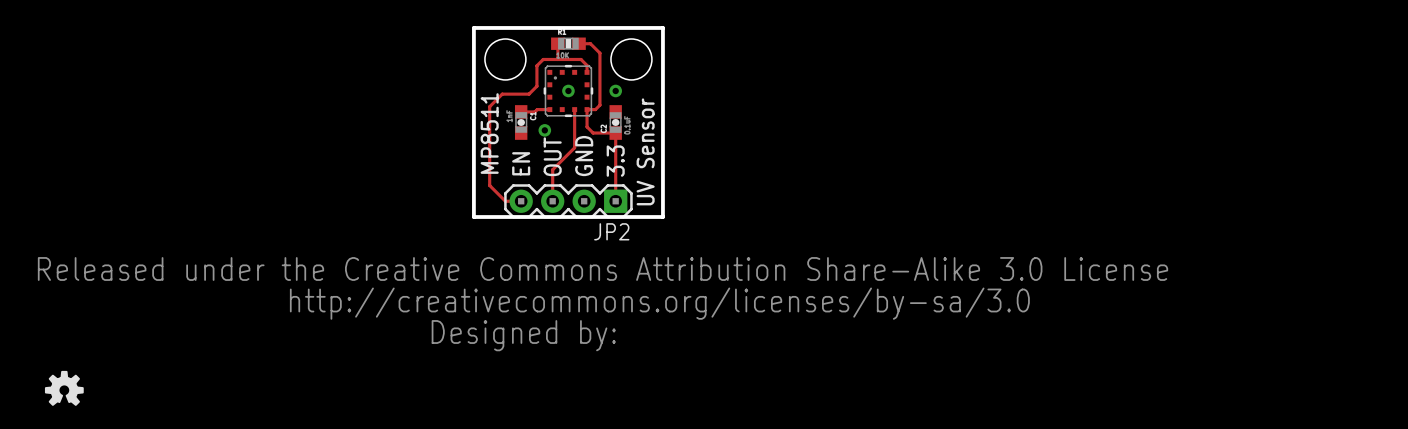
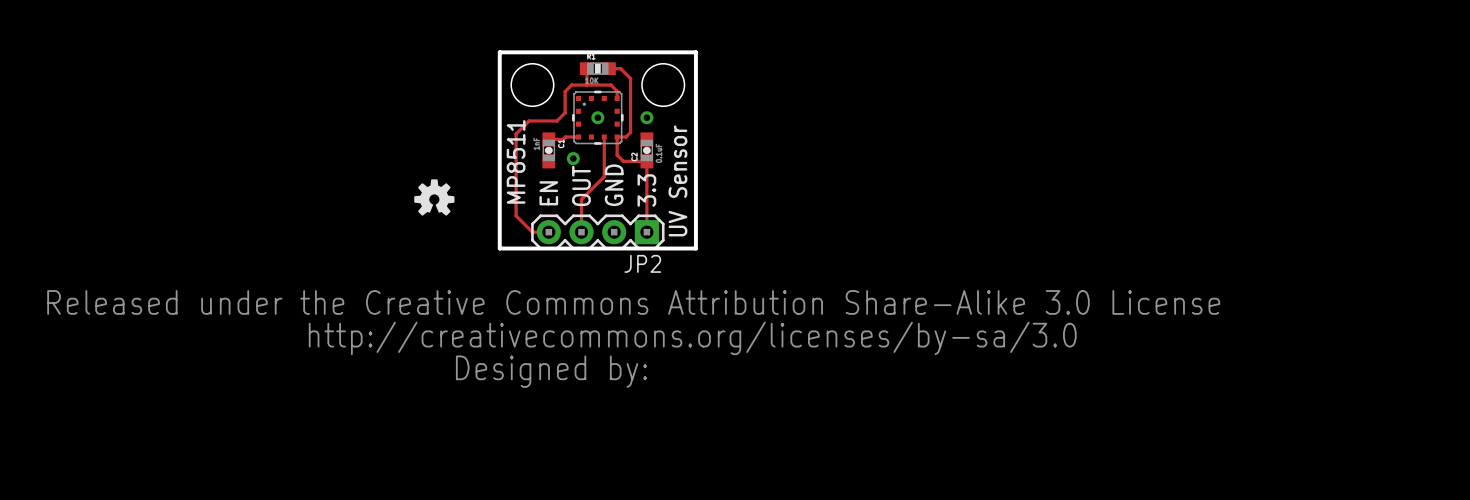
drawing: none -> [414, 179, 455, 216]
drawing: [44, 370, 84, 406] -> none

